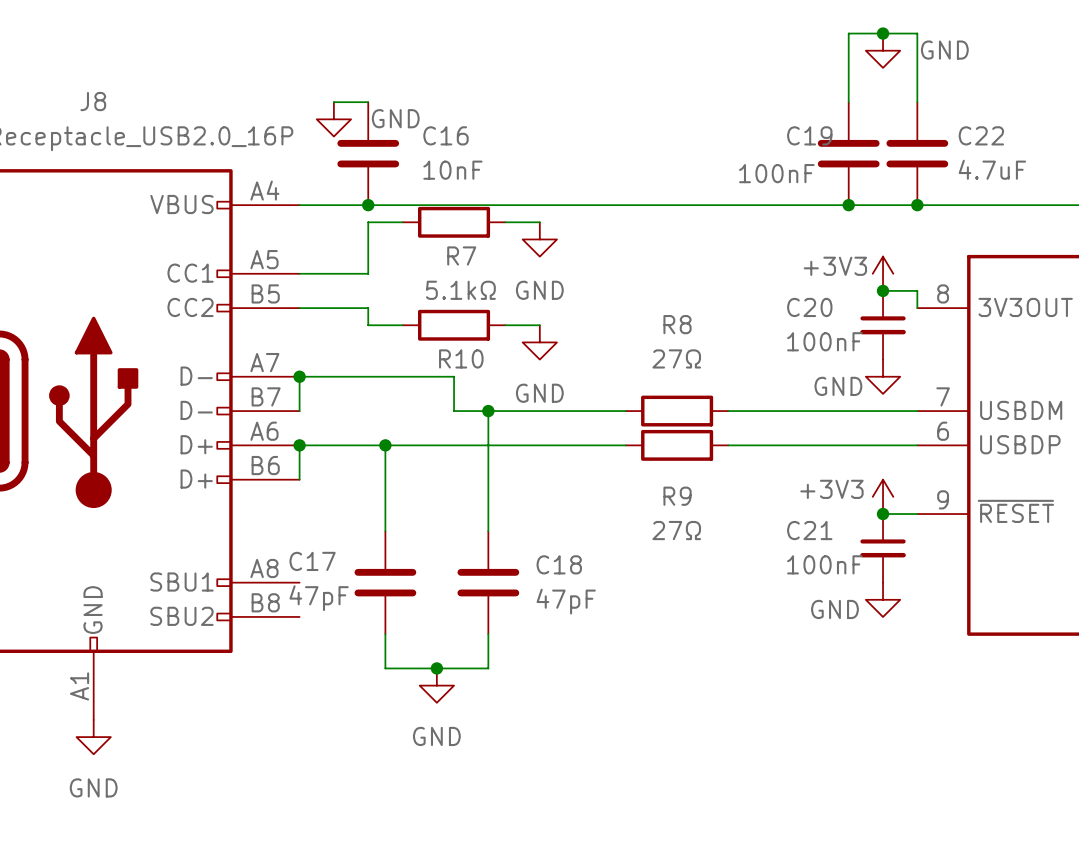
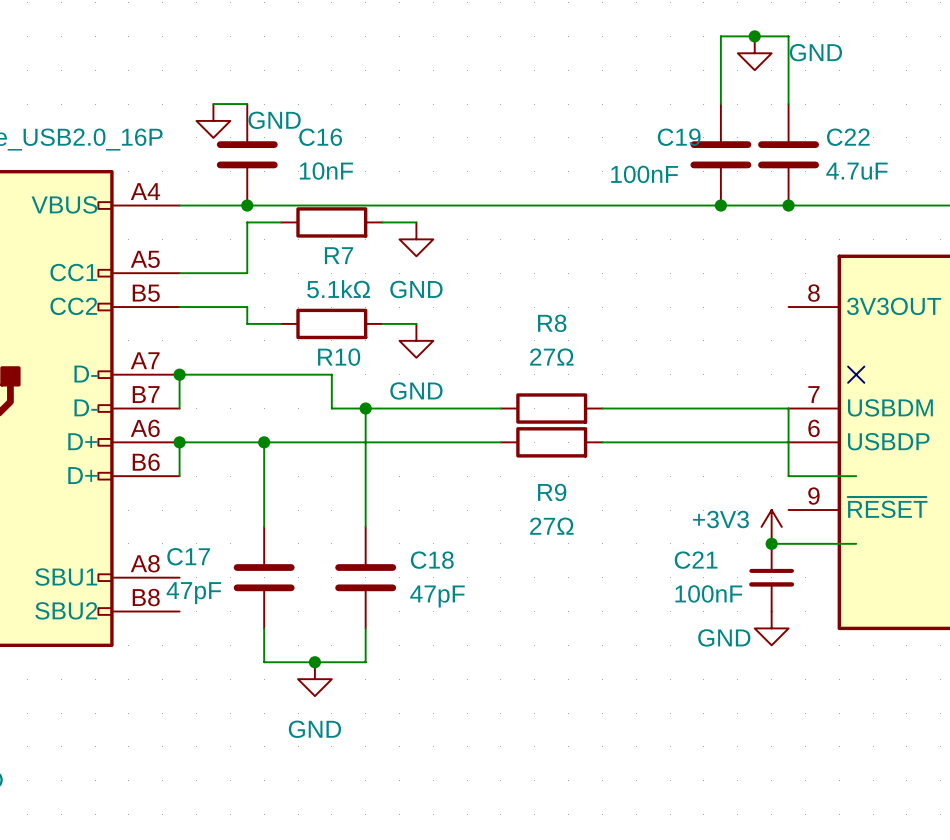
power symbol: +3V3 (883, 273) -> none
wire: (883, 290) (917, 290) (917, 308) -> none
junction: (883, 290) -> none
C20: 100nF (883, 325) -> none
power symbol: GND (883, 376) -> none
no-connect mark: none -> (856, 374)
wire: none -> (788, 408) (788, 476) (856, 476)
power symbol position: +3V3 (883, 496) -> +3V3 (771, 526)
wire: (883, 514) (917, 514) -> none
junction position: (883, 514) -> (771, 543)
C21 position: (883, 548) -> (771, 577)
wire: none -> (771, 543) (856, 543)
power symbol position: GND (883, 599) -> GND (771, 628)

